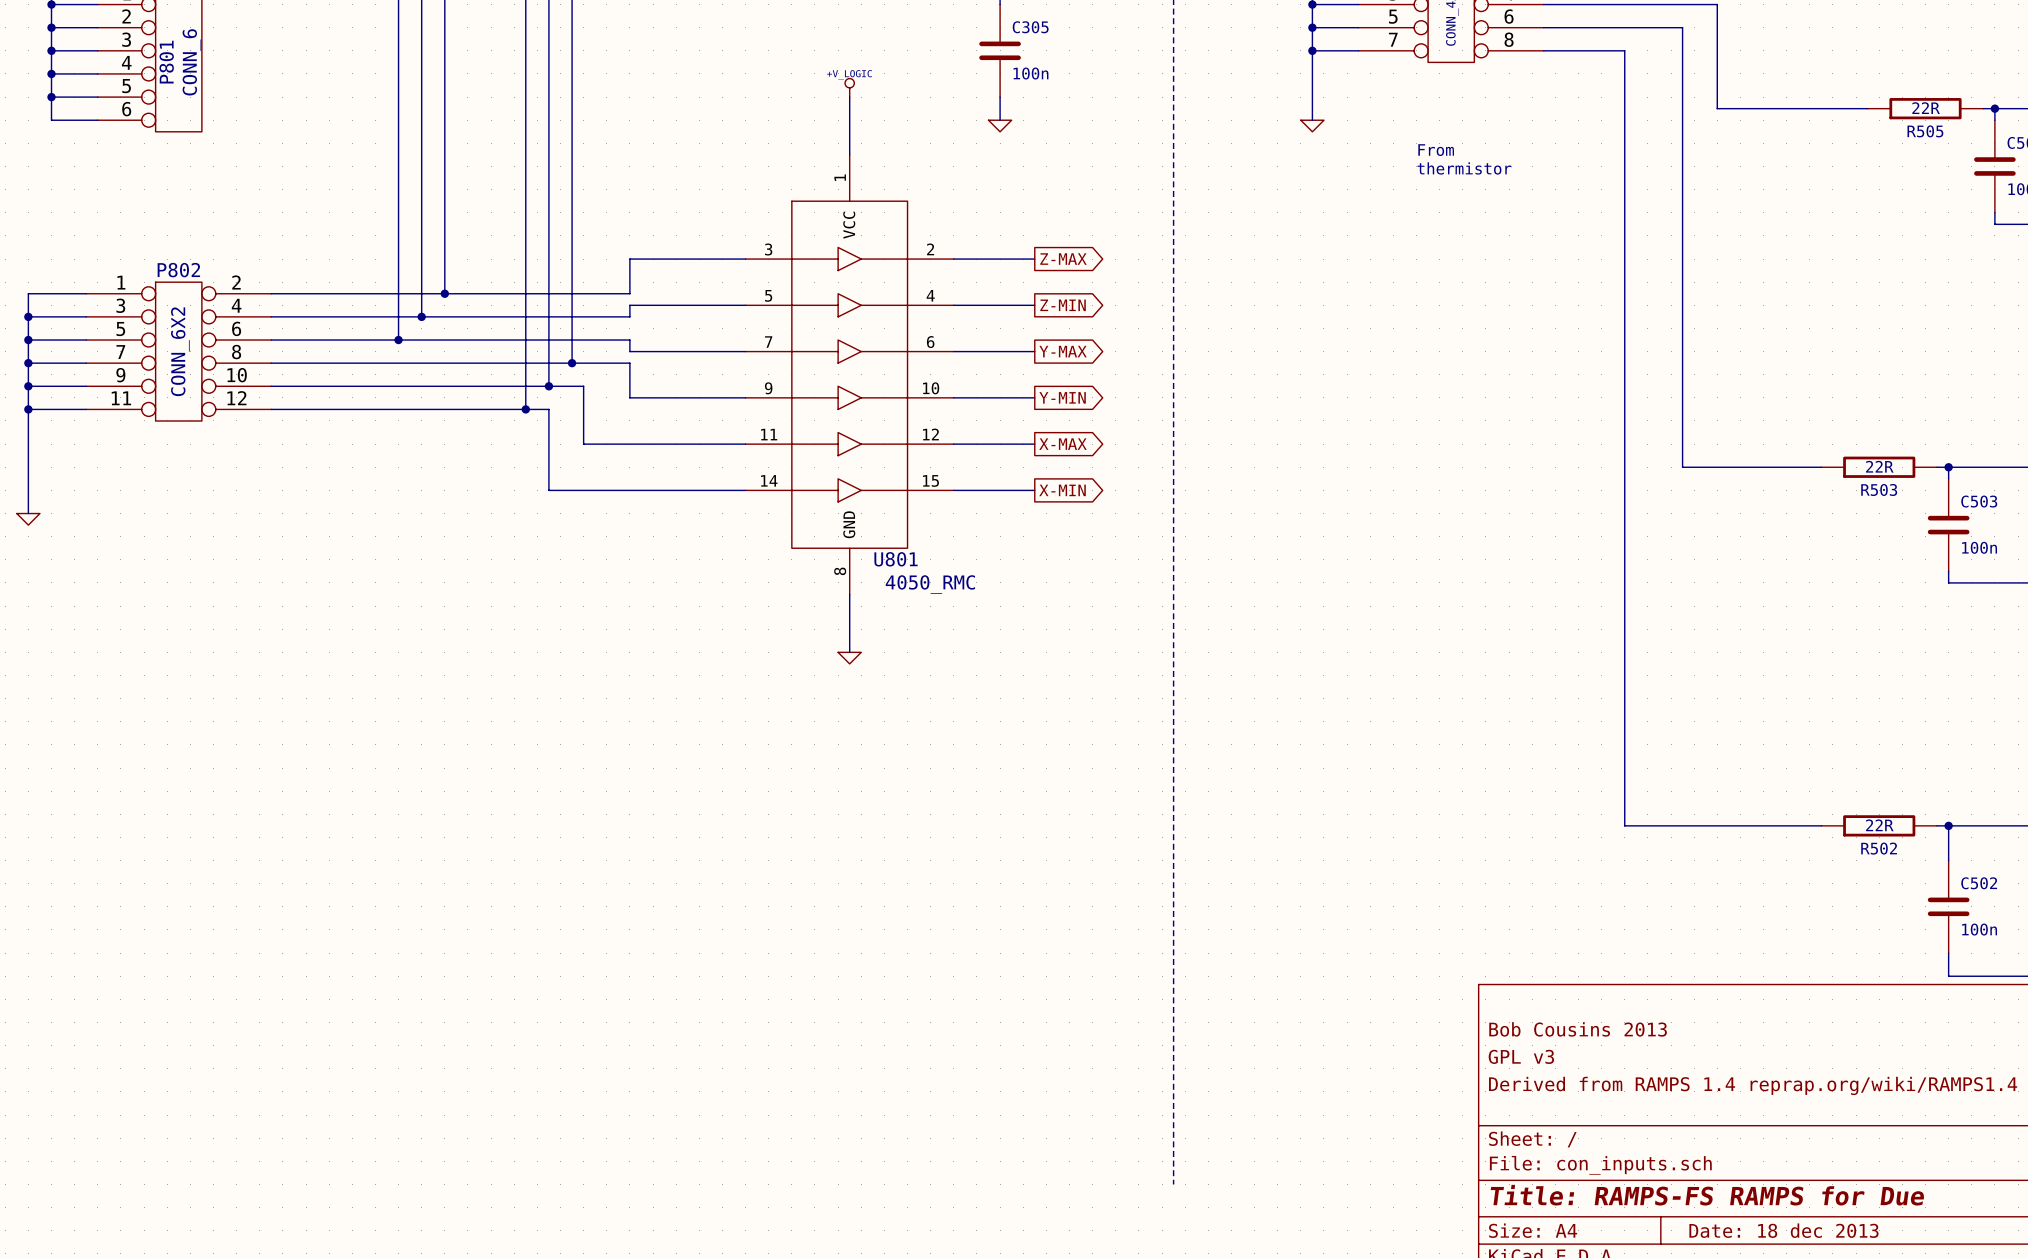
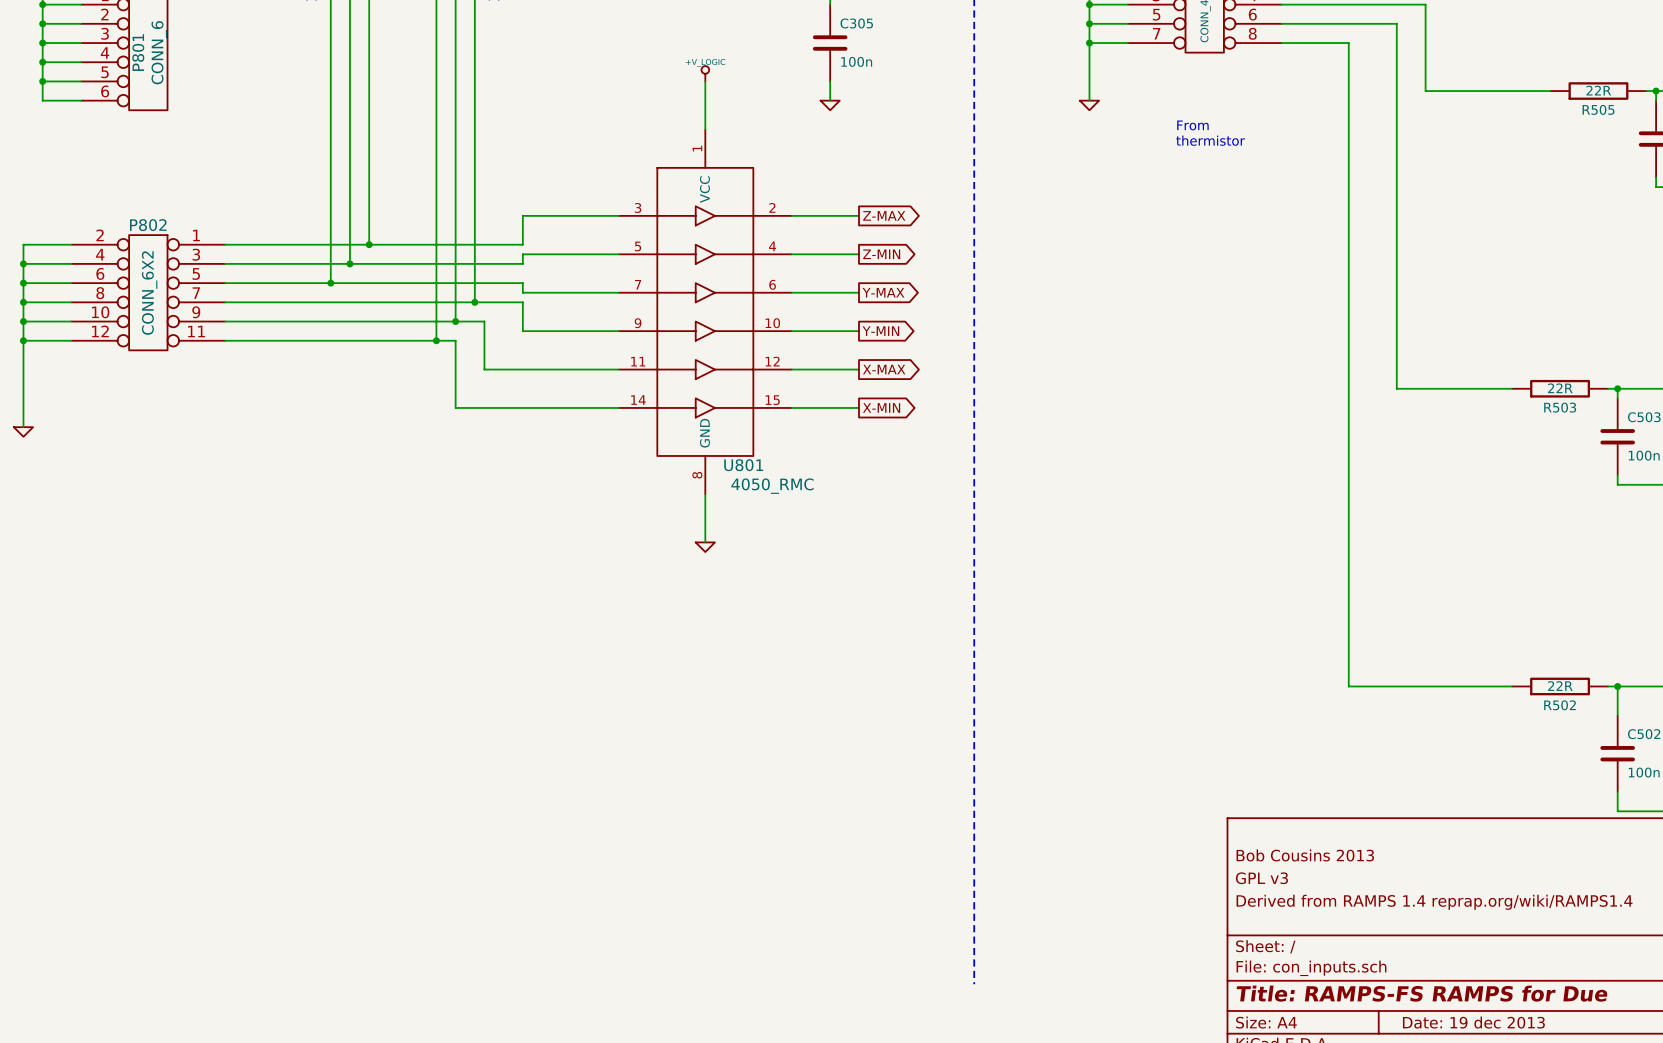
P802 flip: as is (178, 351) -> left-right (148, 292)
title block: Date: 18 dec 2013 (1783, 1230) -> Date: 19 dec 2013 (1473, 1022)

